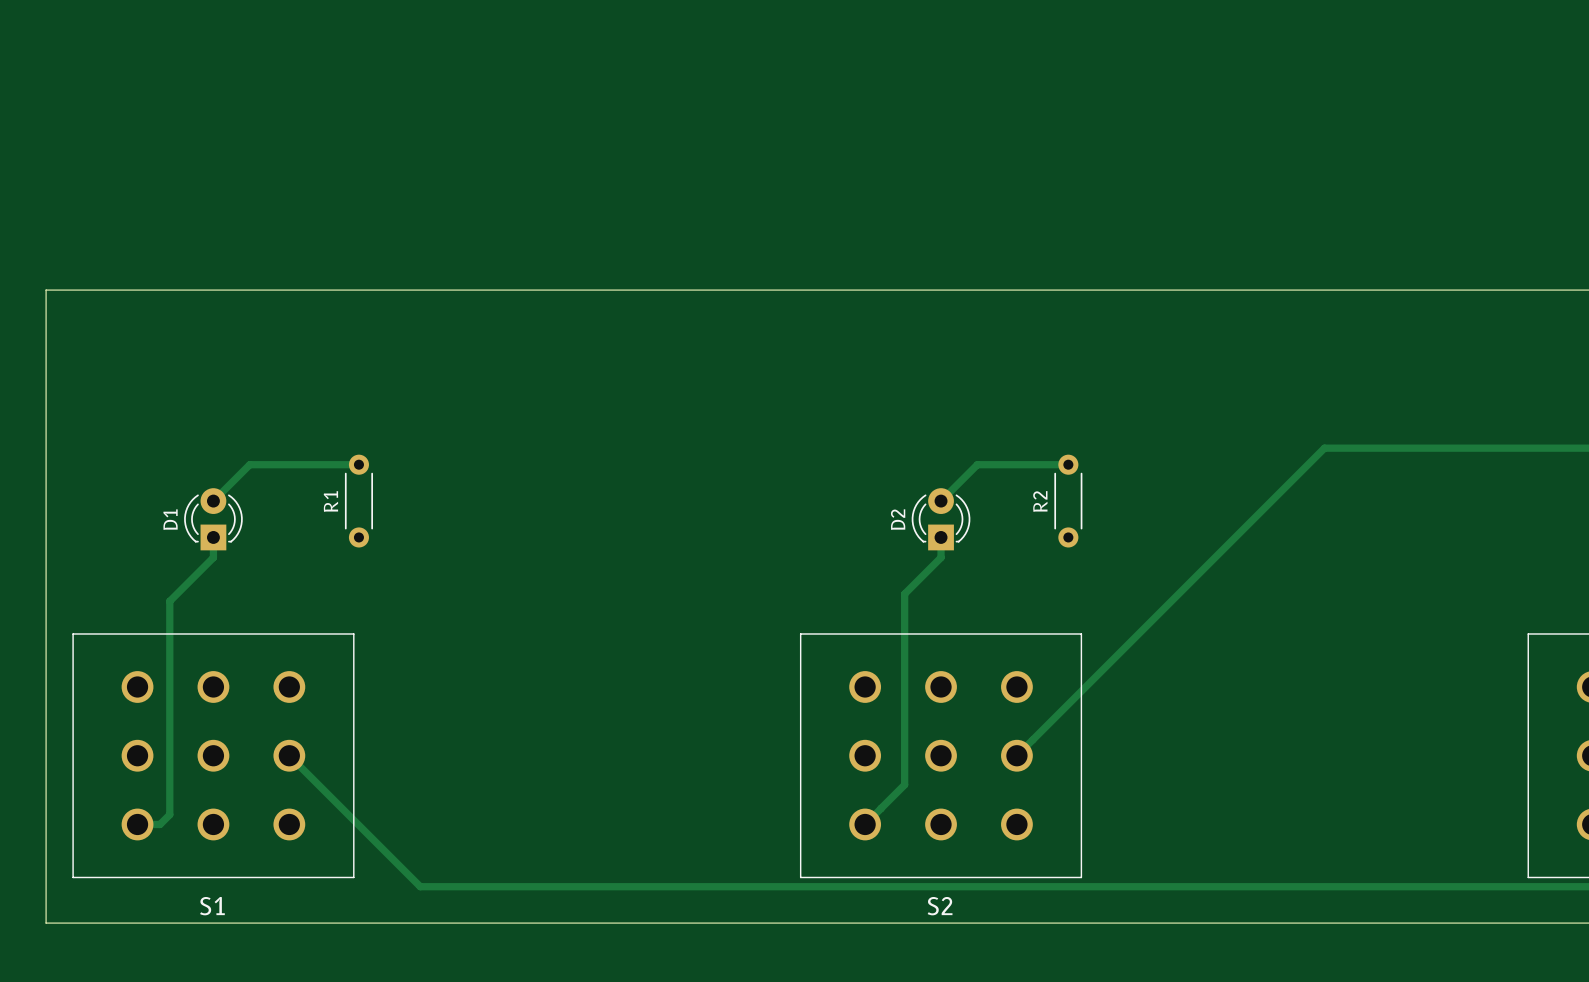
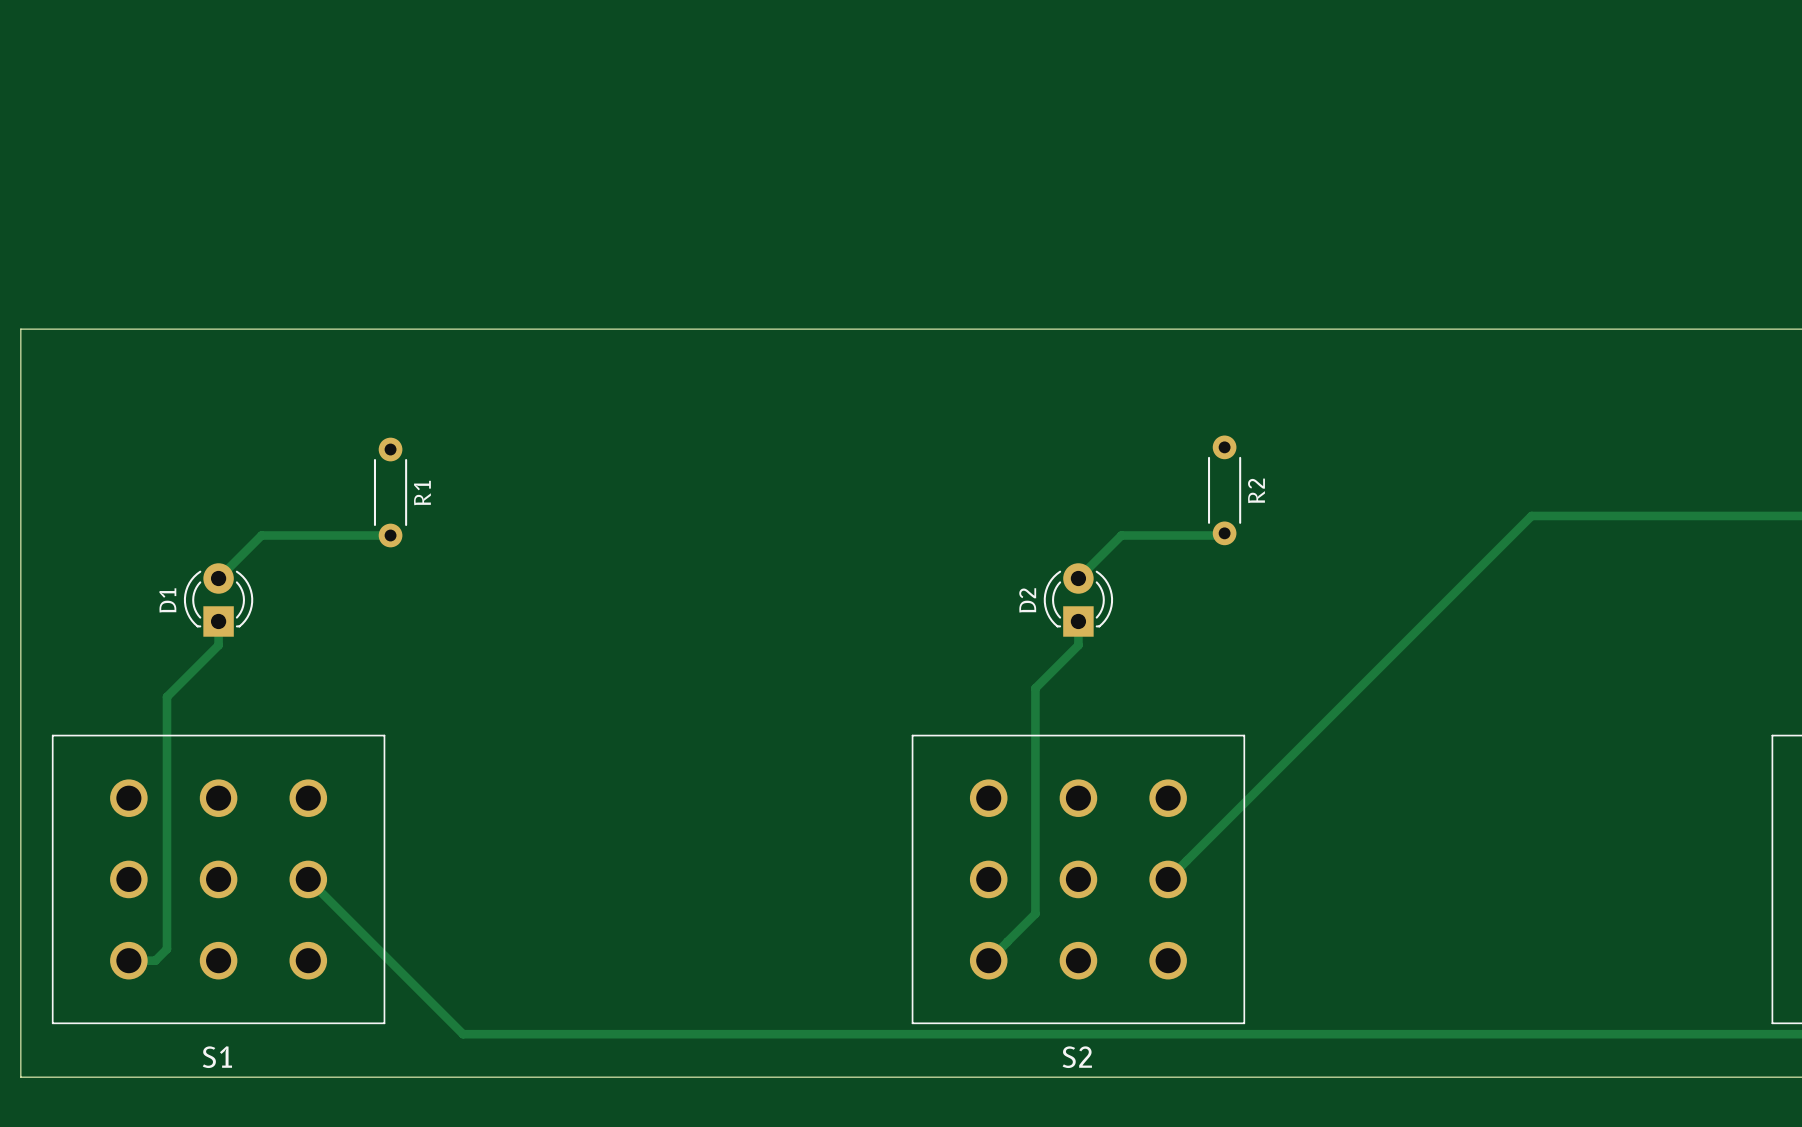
R1 name position: R1 (330, 501) -> R1 (422, 493)
R1 position: (358, 501) -> (390, 492)
R2 name position: R2 (1040, 501) -> R2 (1256, 490)
R2 position: (1068, 501) -> (1224, 490)

